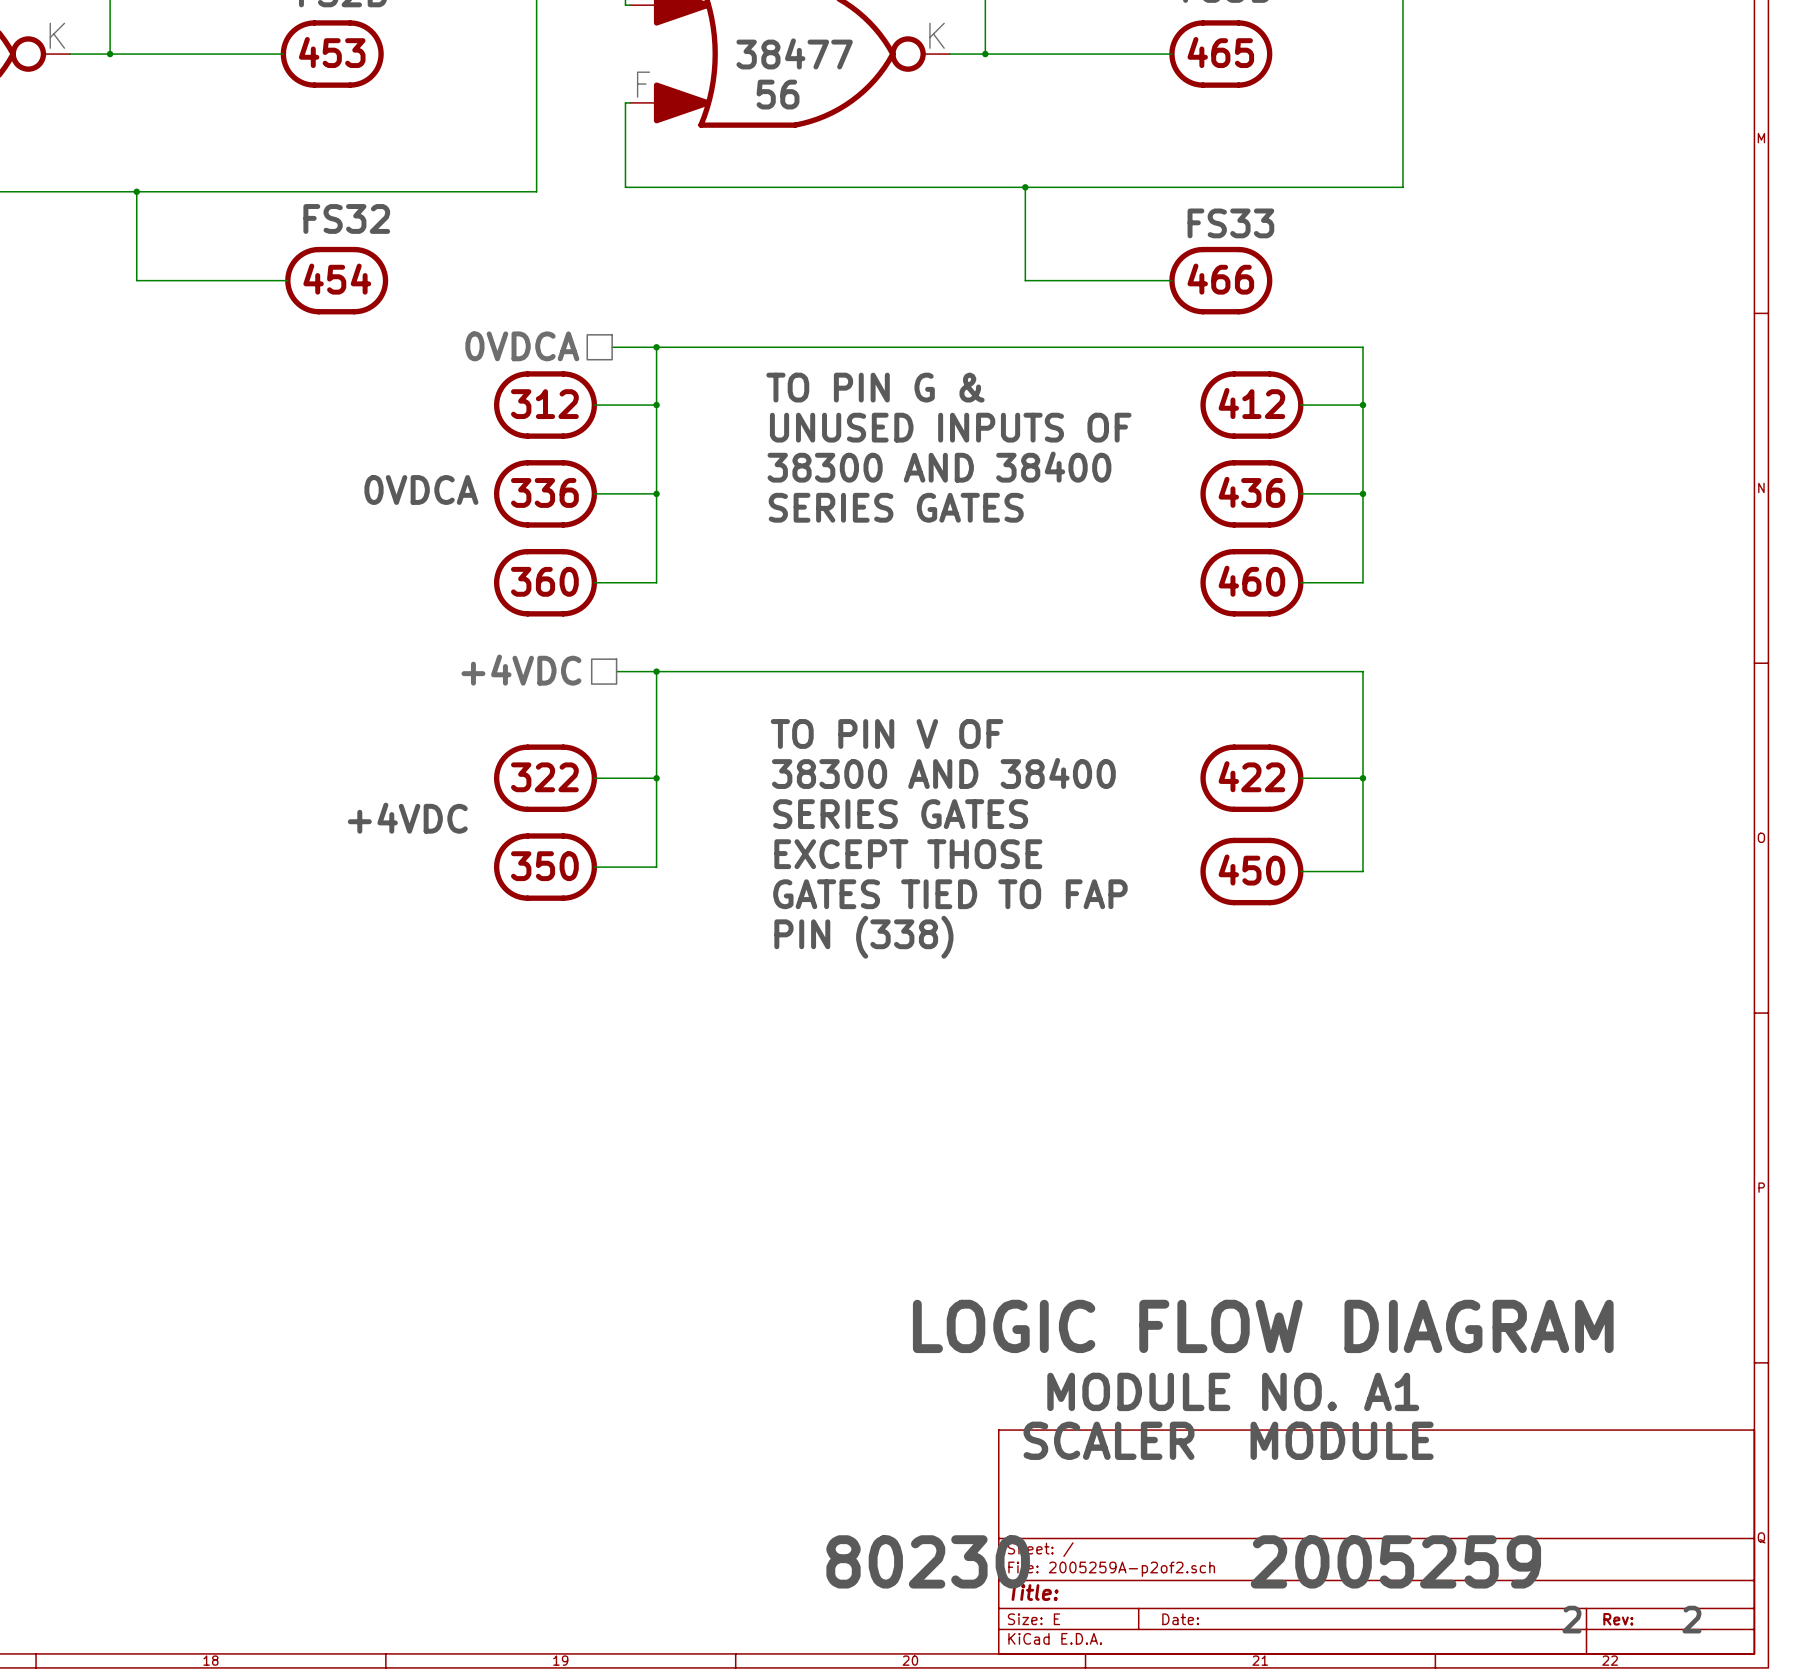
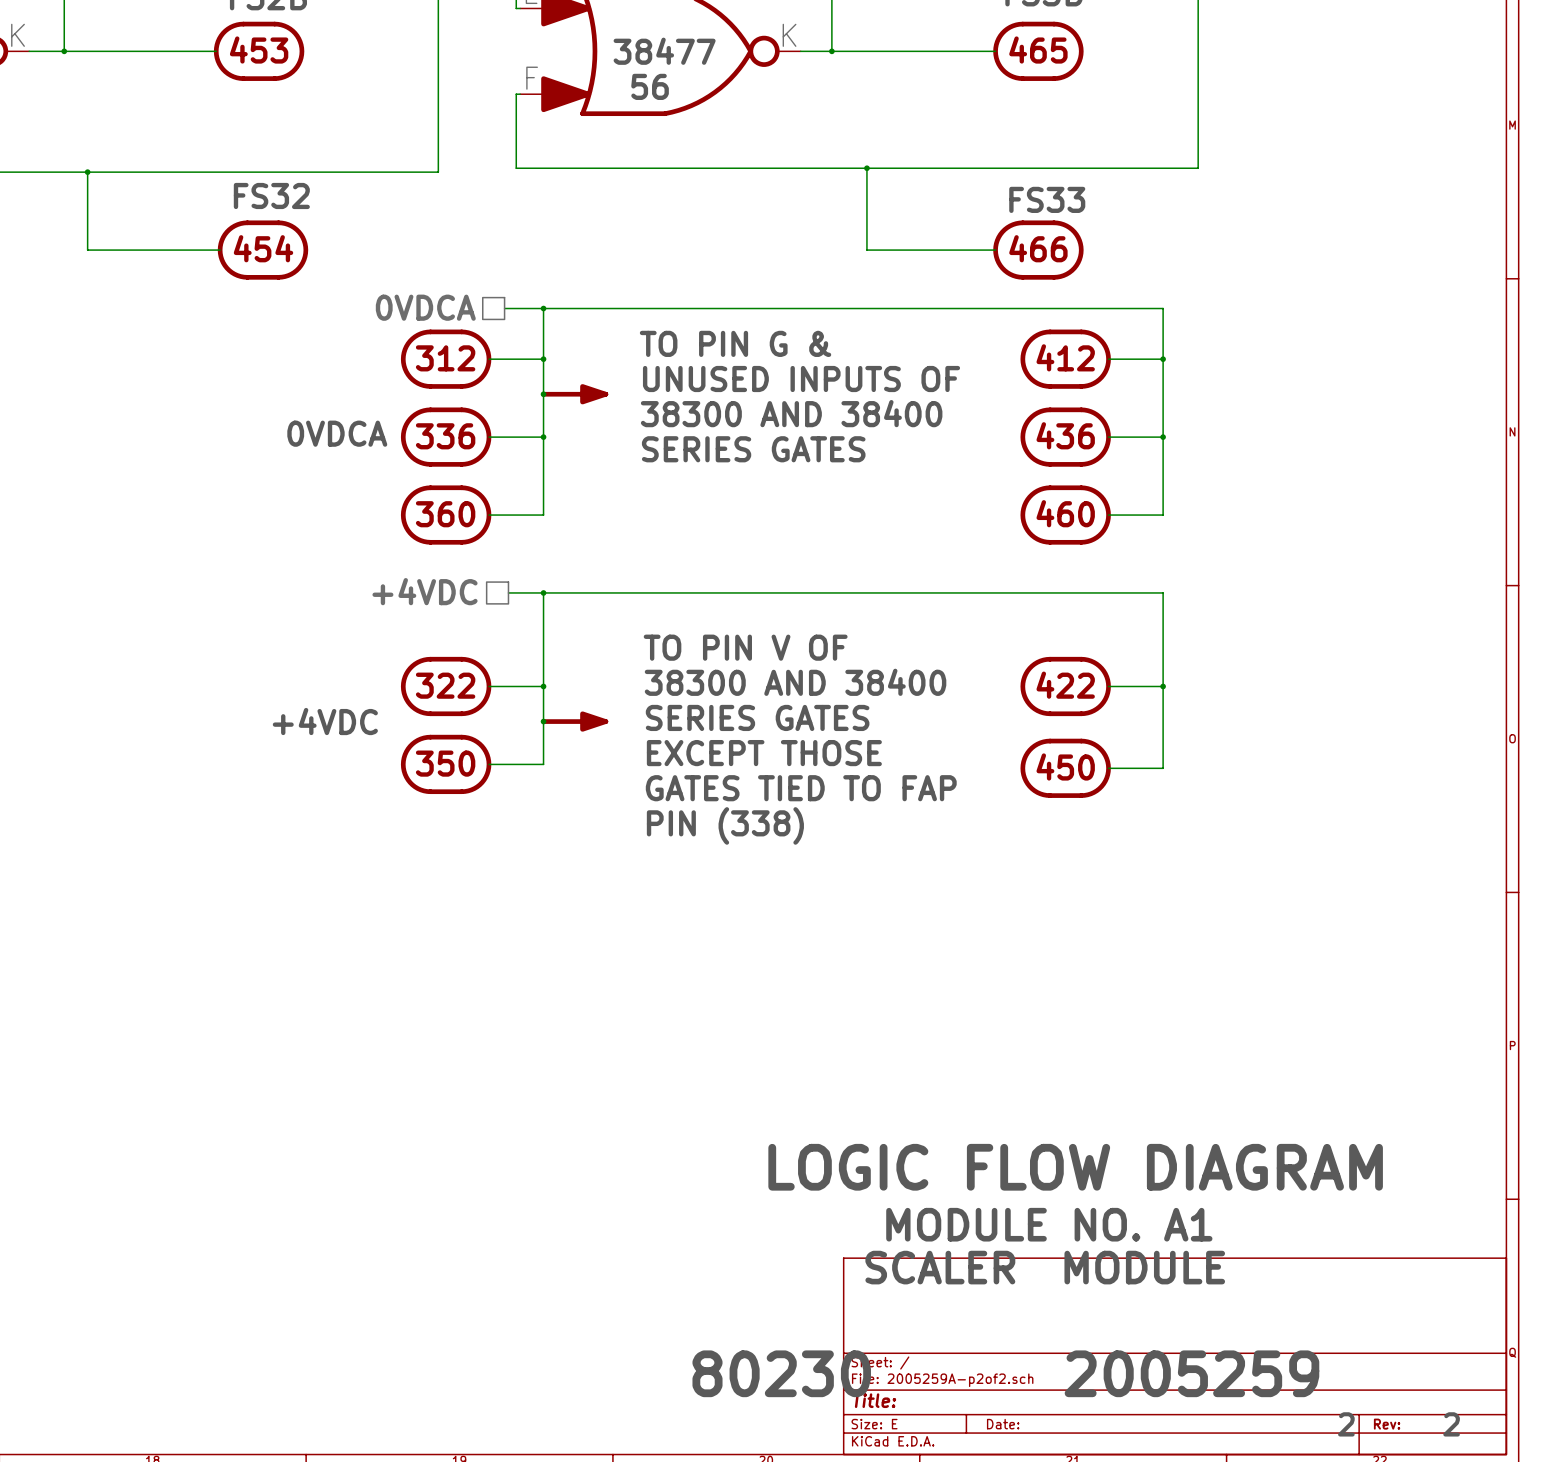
junction: none -> (543, 394)
power symbol: none -> (574, 394)
junction: none -> (543, 721)
power symbol: none -> (574, 721)

